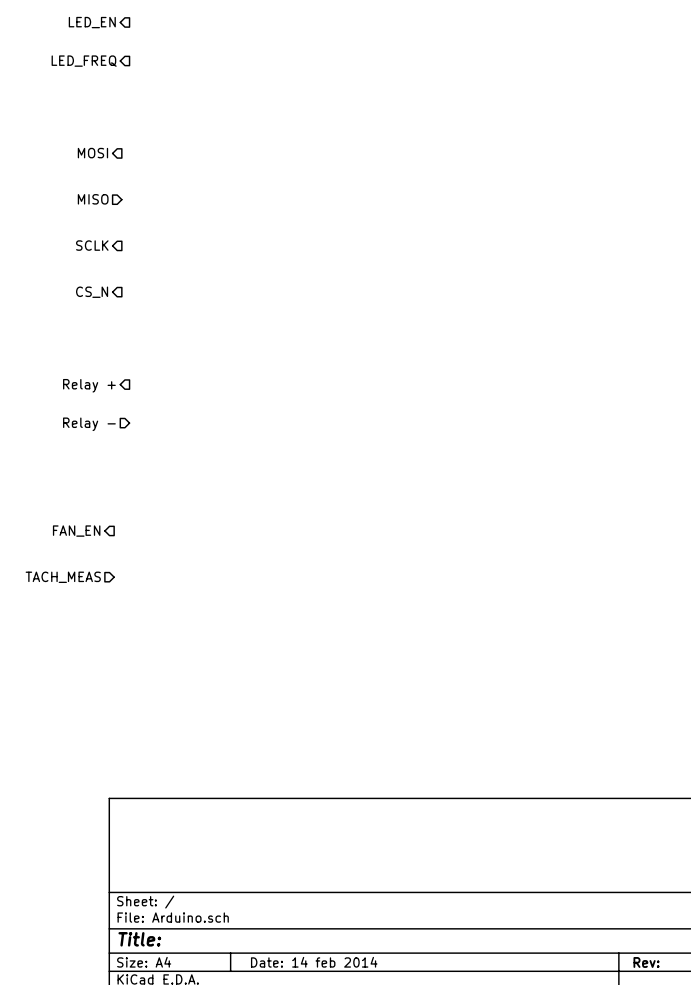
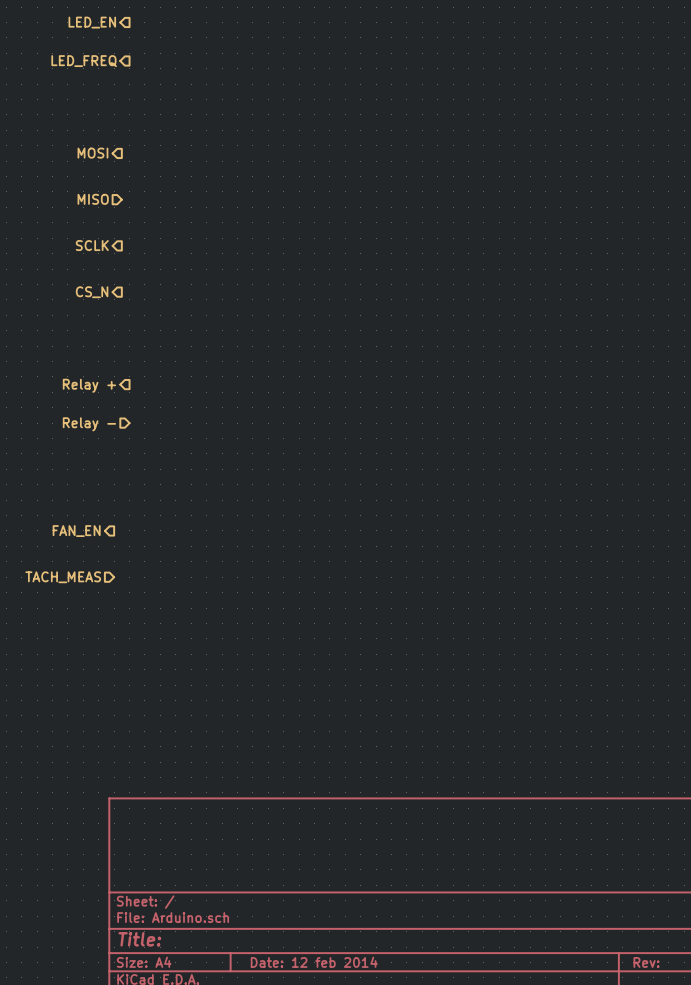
title block: Date: 14 feb 2014 (314, 962) -> Date: 12 feb 2014 (314, 962)

